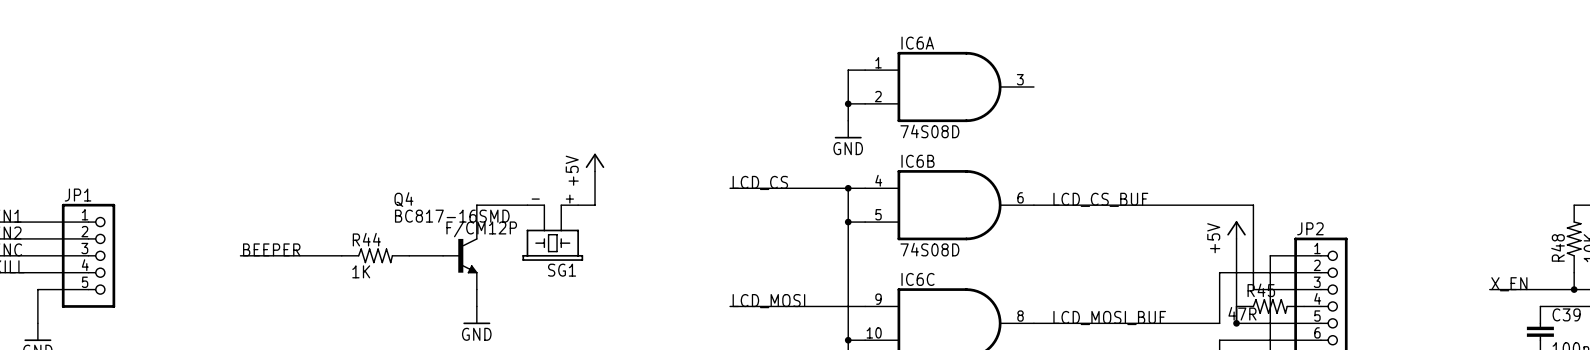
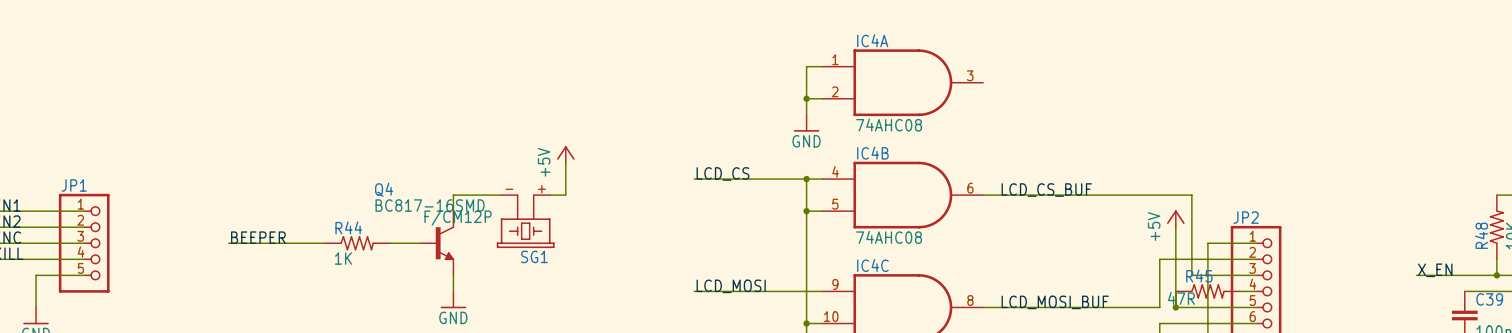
IC6A name: IC6A (917, 43) -> IC4A (872, 40)
IC6A value: 74S08D (929, 131) -> 74AHC08 (889, 125)
IC6B name: IC6B (917, 161) -> IC4B (872, 153)
IC6B value: 74S08D (929, 249) -> 74AHC08 (889, 237)
IC6C name: IC6C (917, 279) -> IC4C (872, 265)

